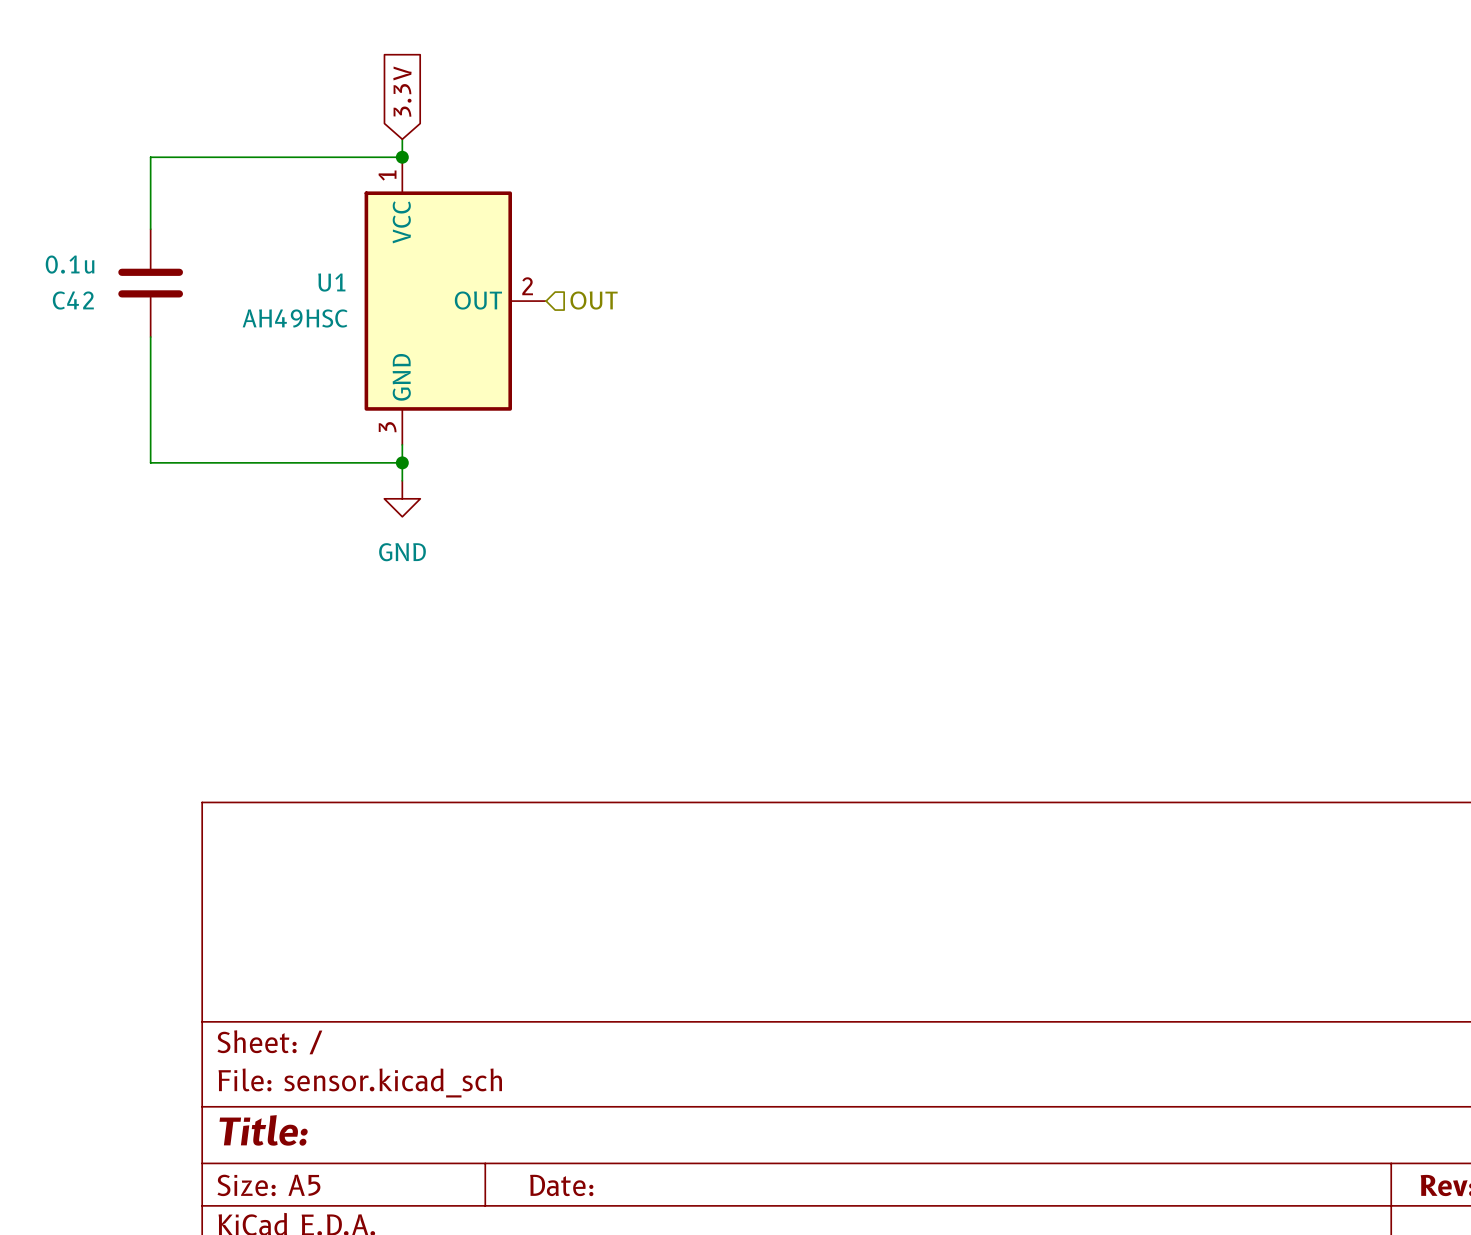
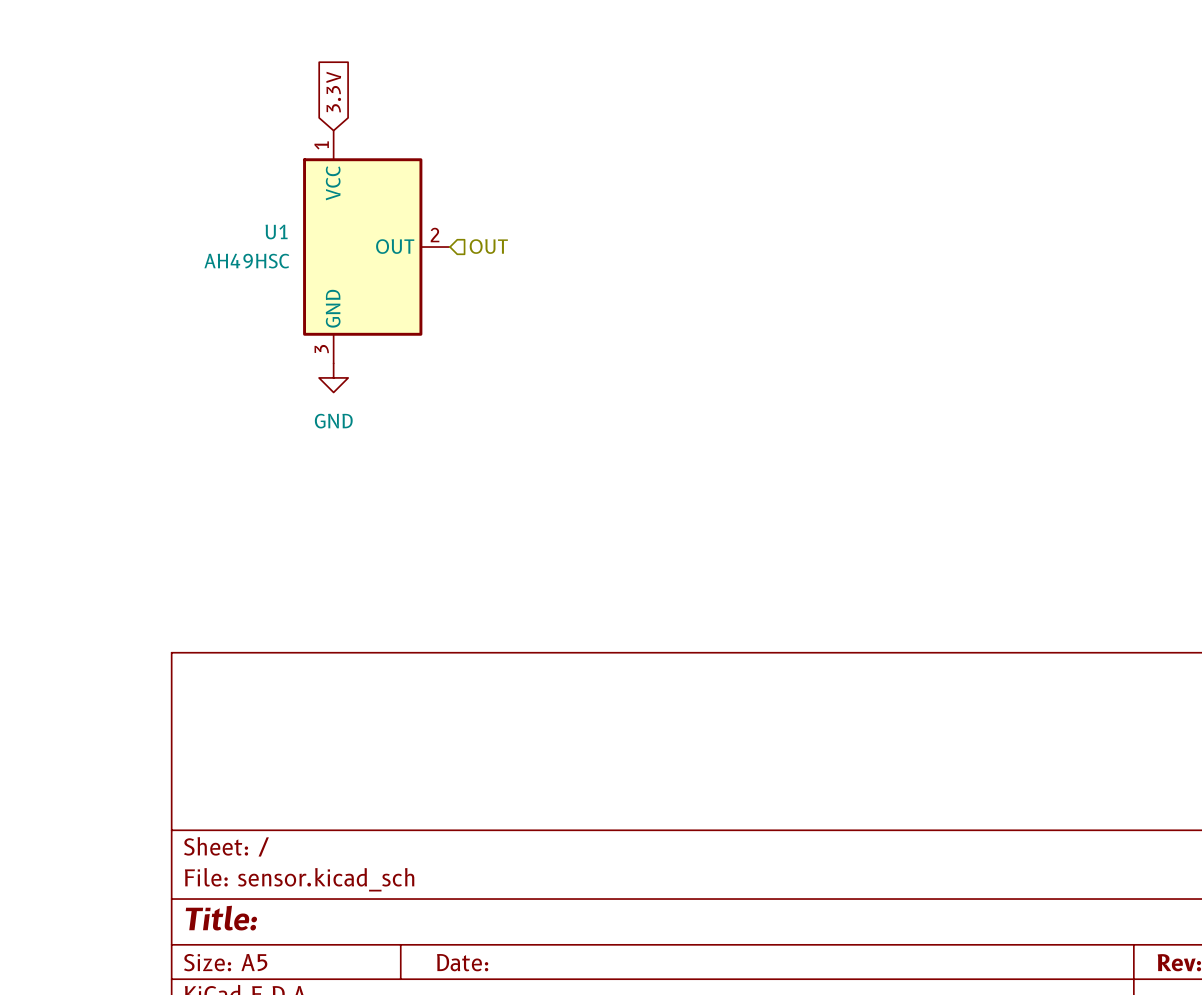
global label position: 3.3V (402, 91) -> 3.3V (333, 92)
wire: (402, 139) (402, 157) (150, 157) (150, 229) -> none
junction: (402, 157) -> none
C42: 0.1u (150, 283) -> none
wire: (150, 337) (150, 462) (402, 462) -> none
junction: (402, 462) -> none
power symbol position: GND (402, 498) -> GND (333, 377)

